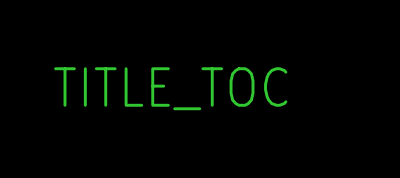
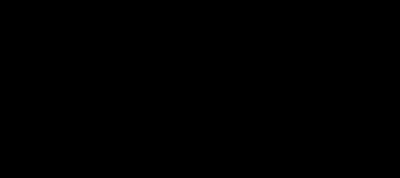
text: TITLE_TOC (170, 88) -> none

